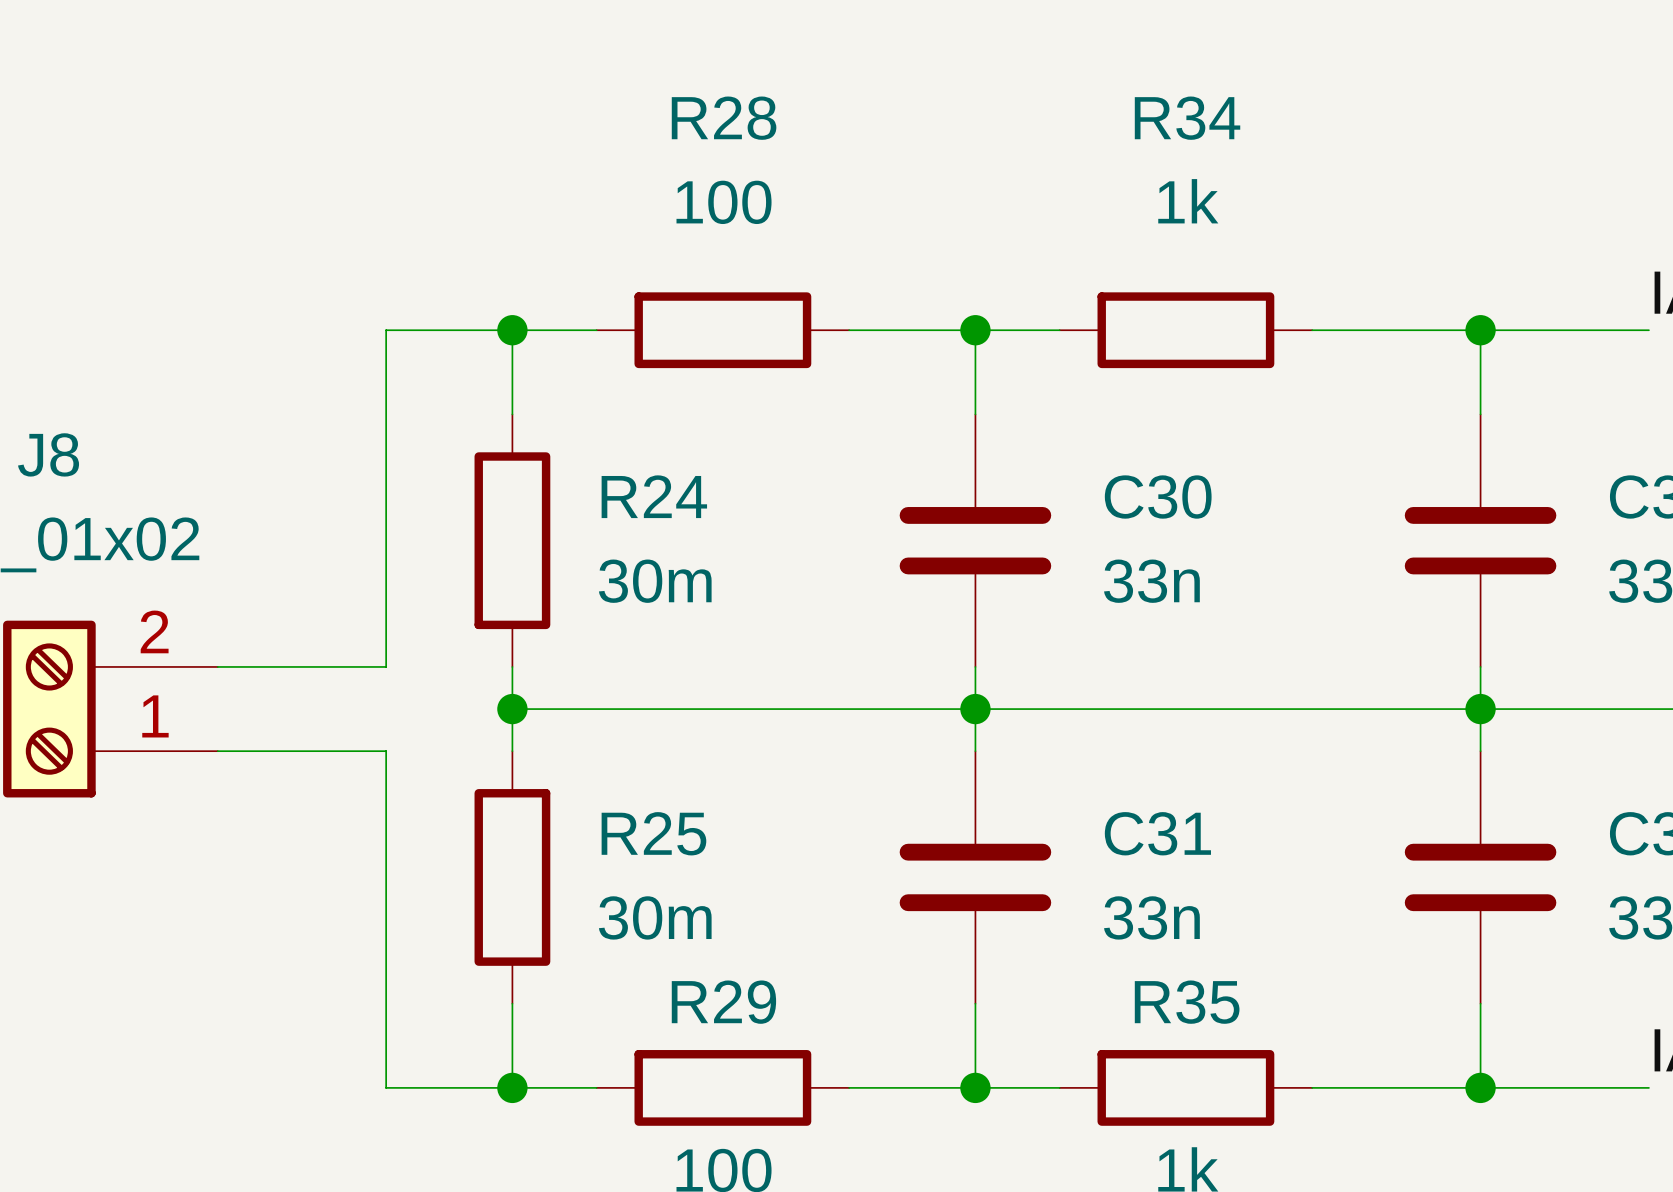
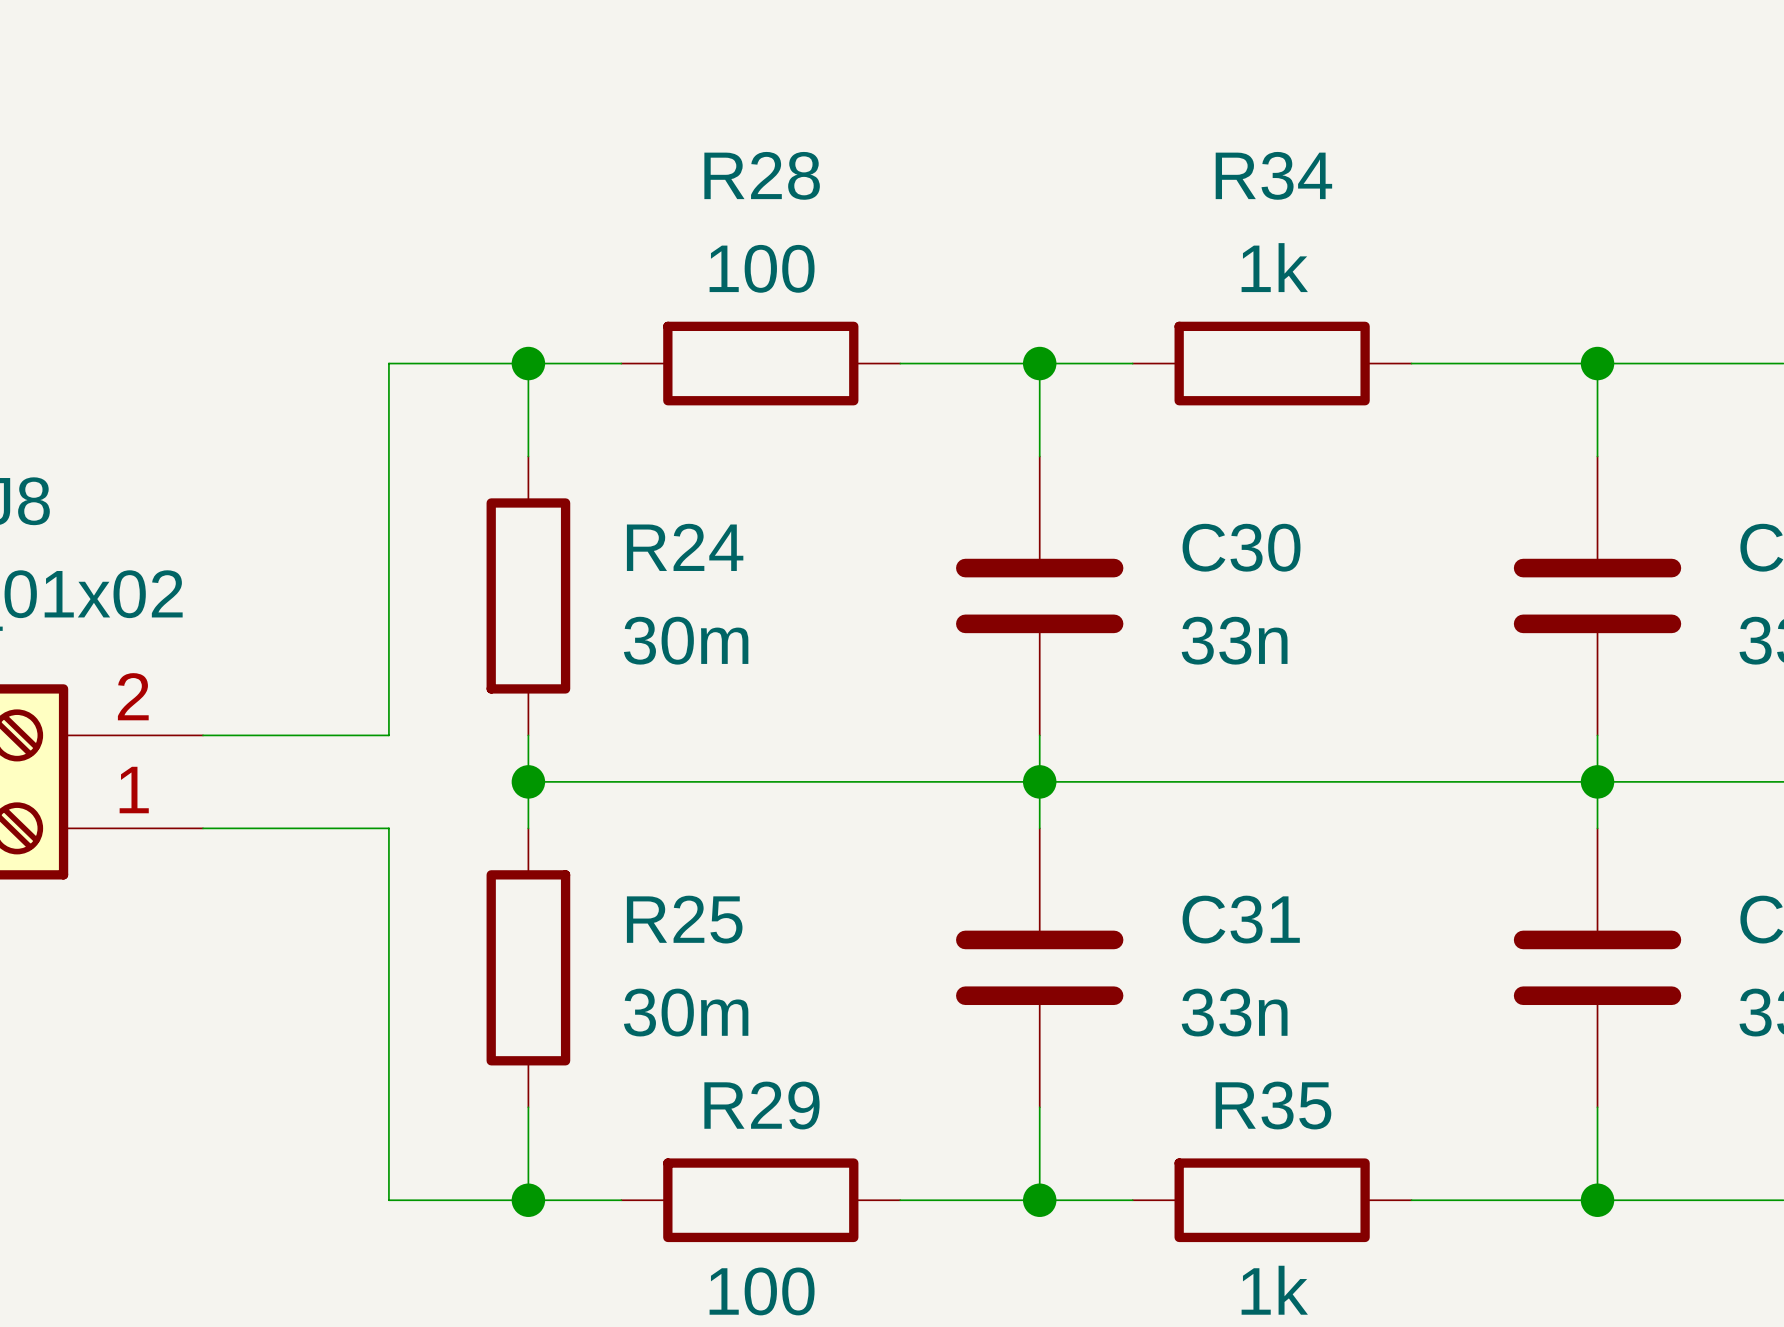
R28 name position: R28 (724, 118) -> R28 (762, 175)
R34 name position: R34 (1187, 118) -> R34 (1273, 175)
R34 value position: 1k (1188, 201) -> 1k (1274, 267)
R28 value position: 100 (724, 202) -> 100 (762, 268)

